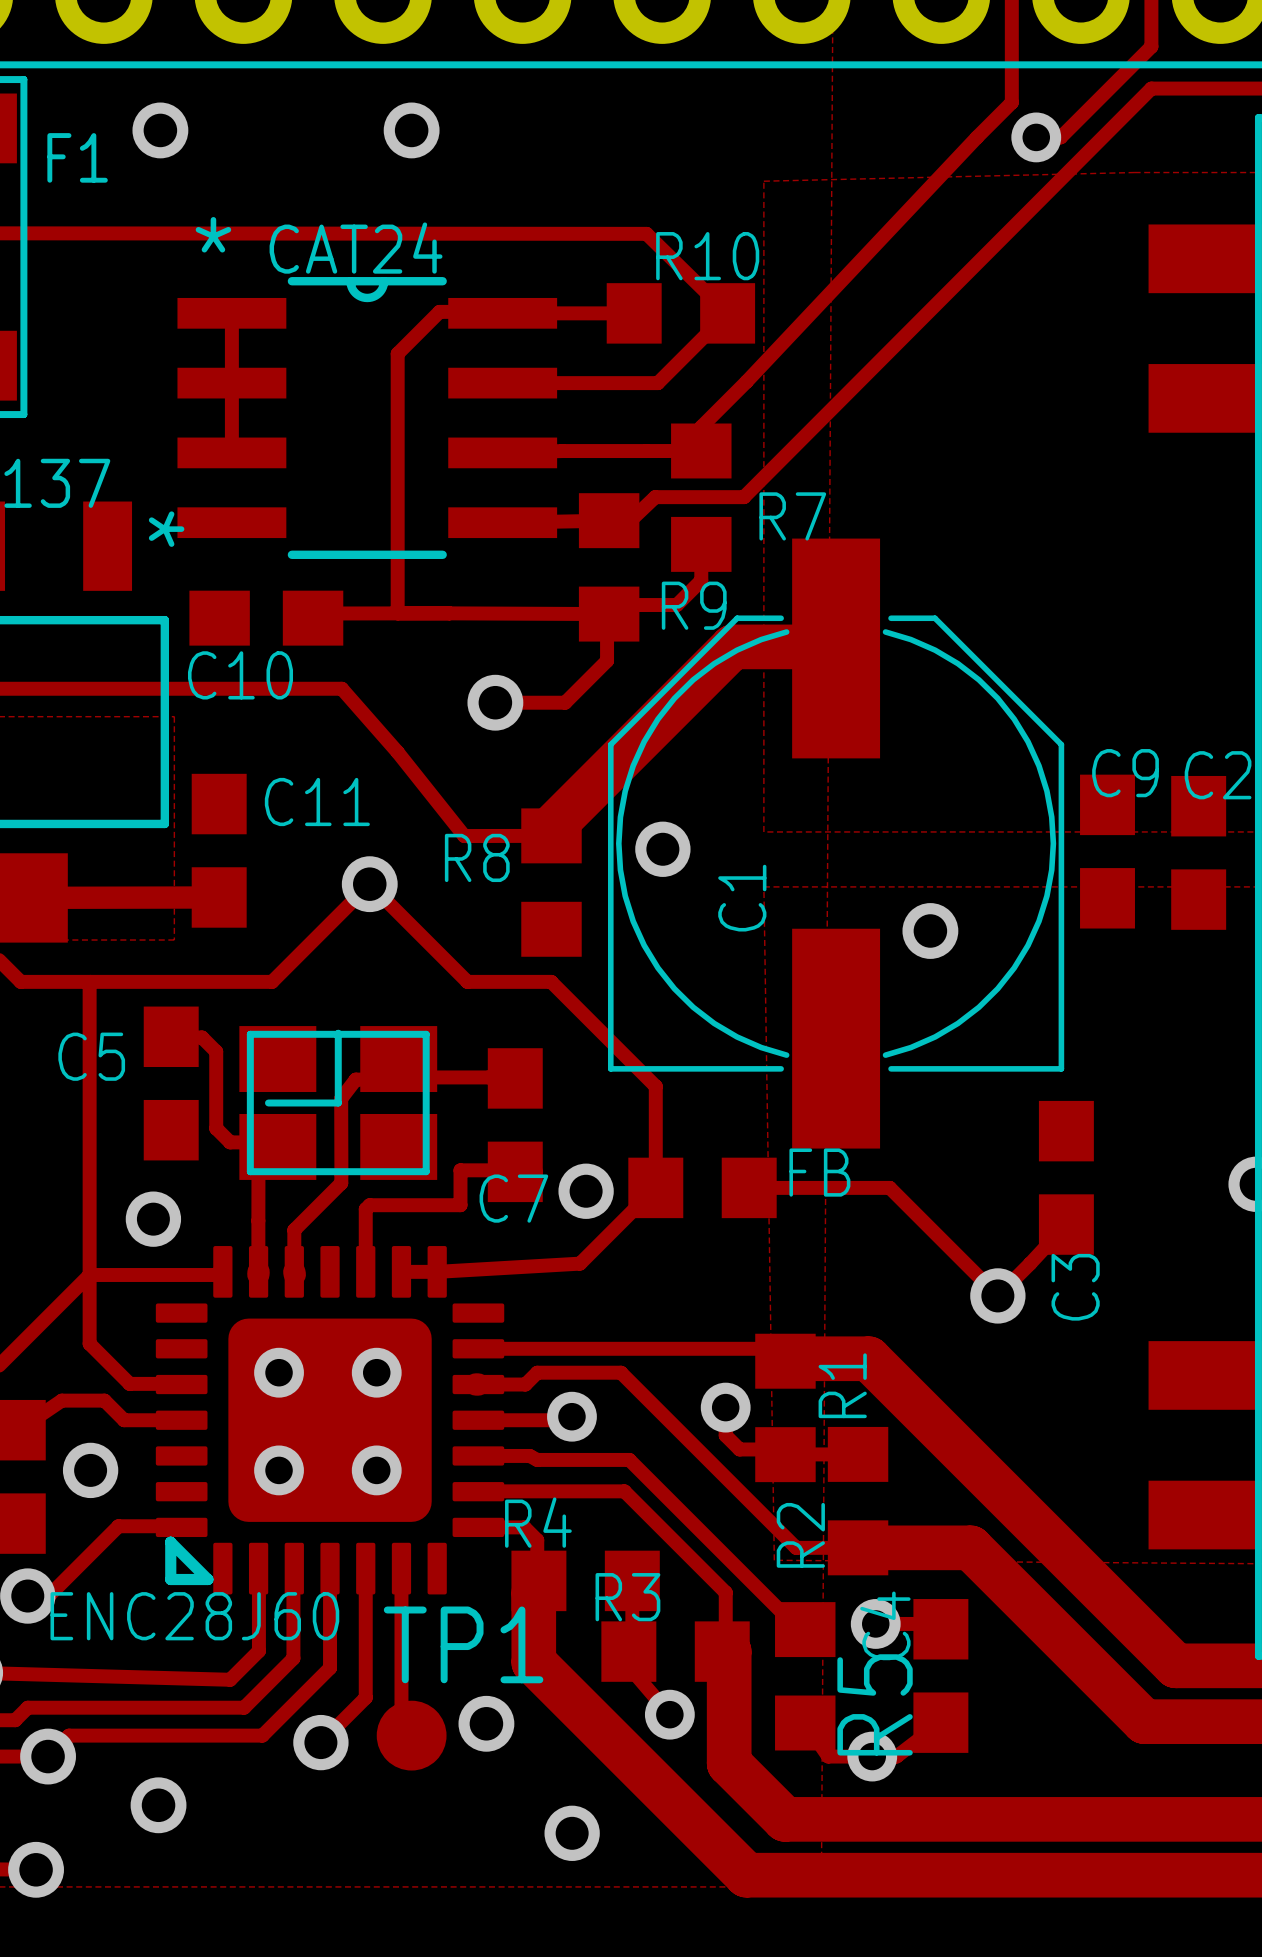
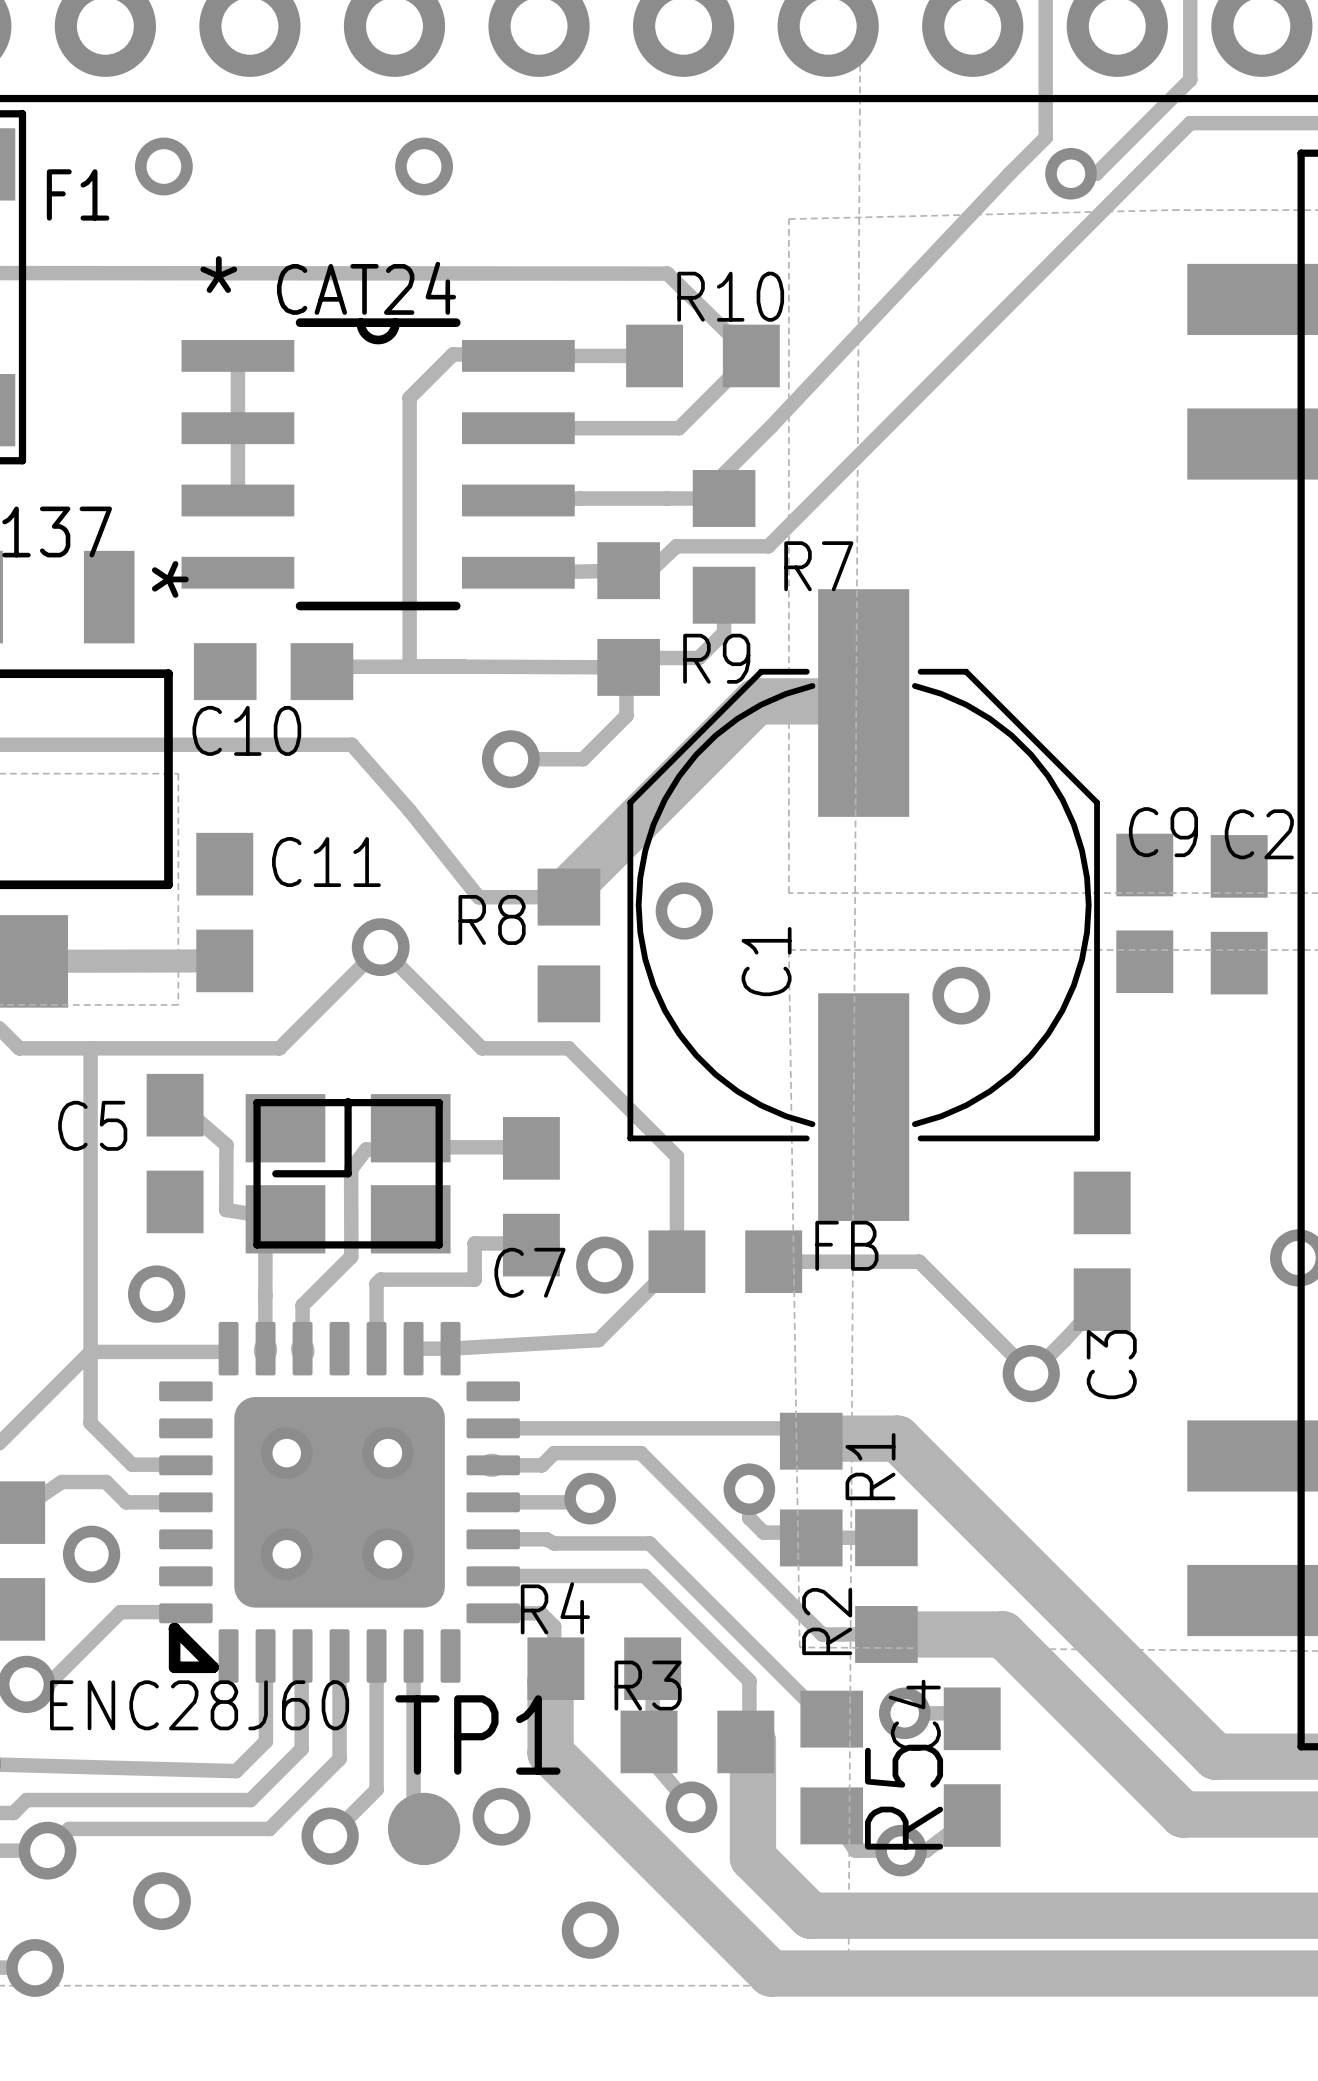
track: (177, 1037) (202, 1037) (216, 1051) (216, 1128) (230, 1142) (273, 1142) (277, 1146) -> (181, 1105) (226, 1144) (226, 1210) (285, 1219)

